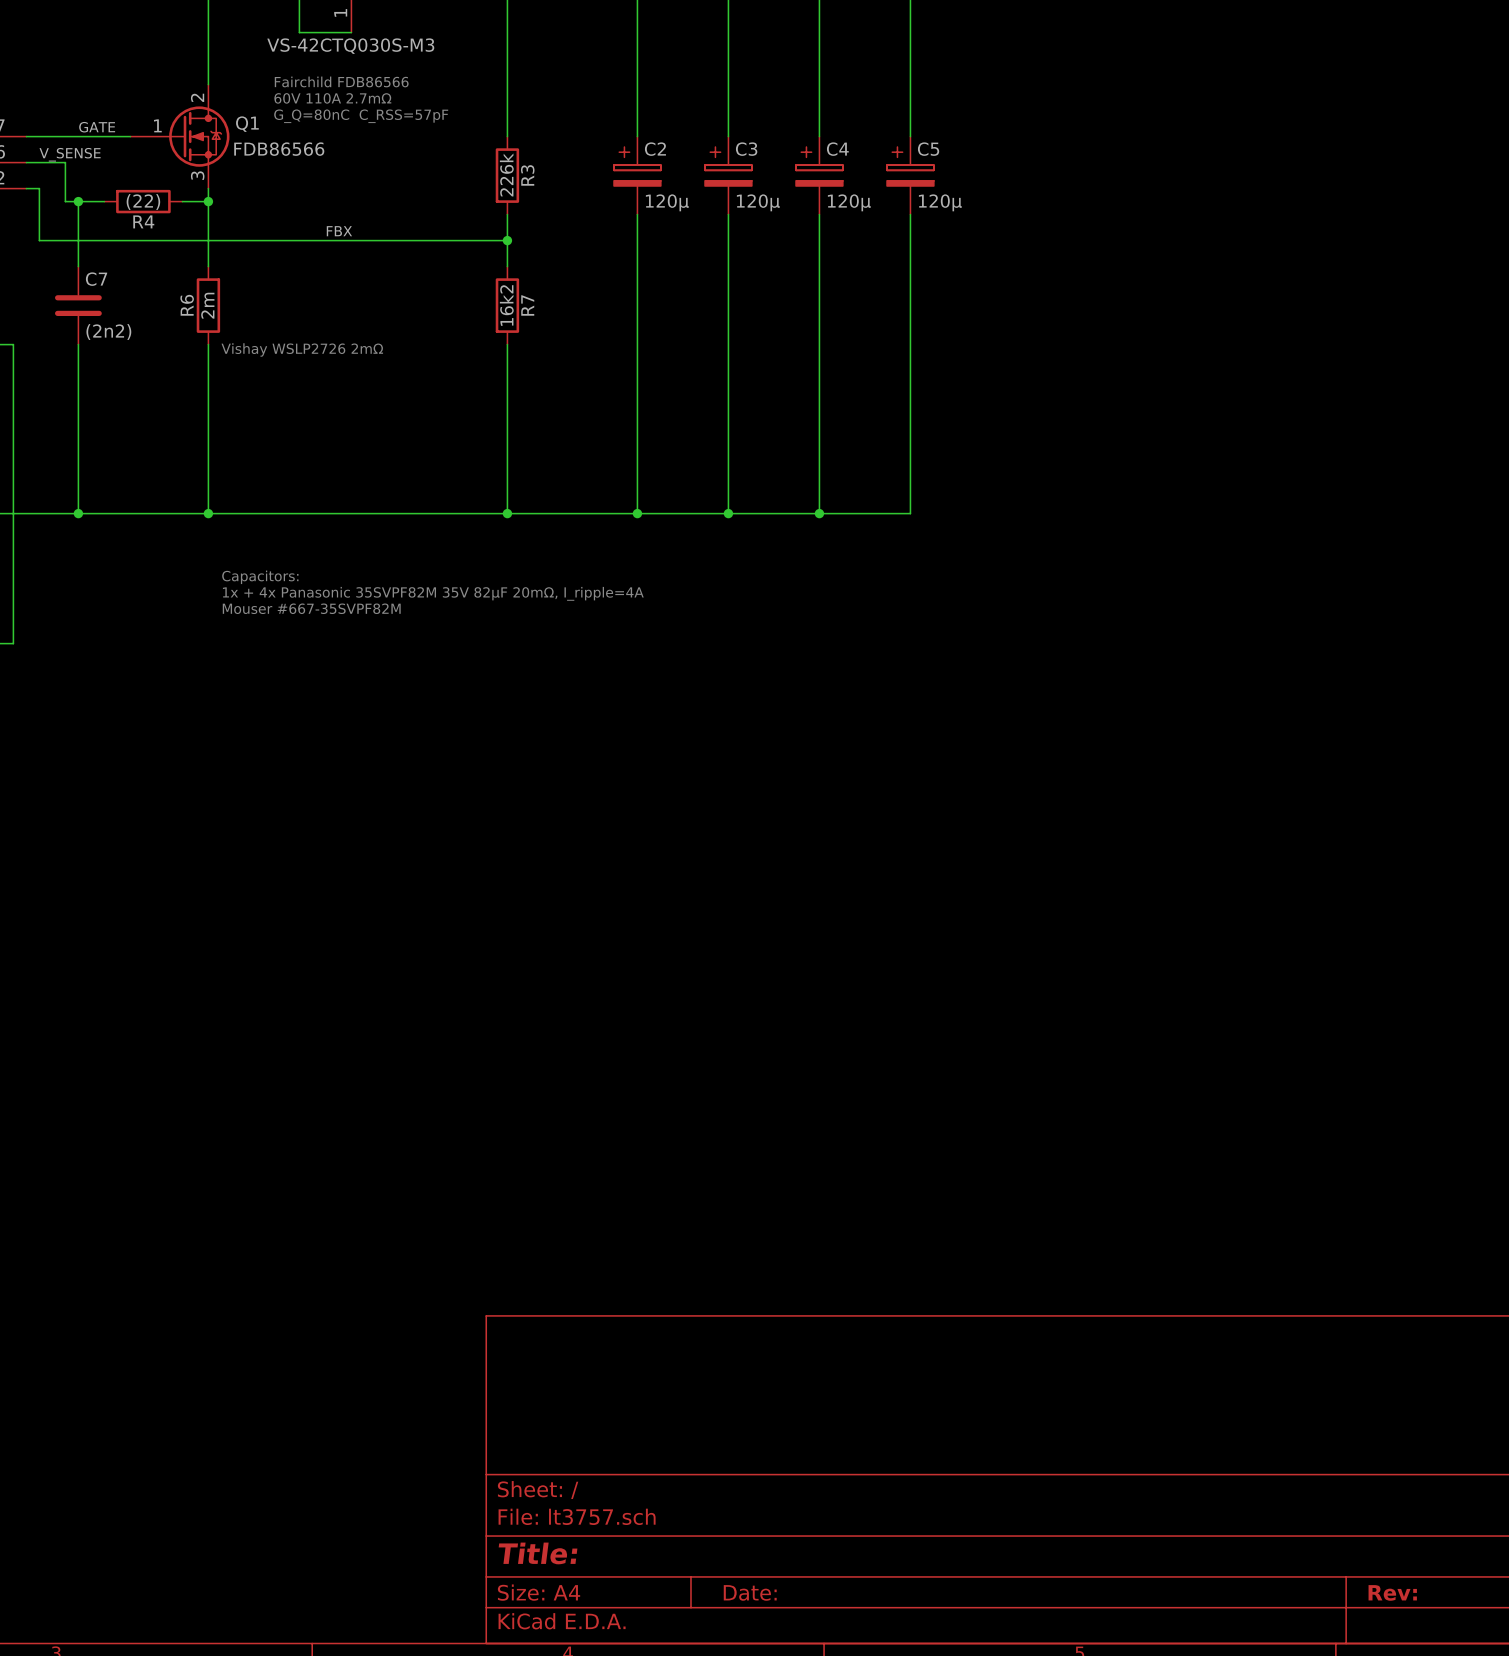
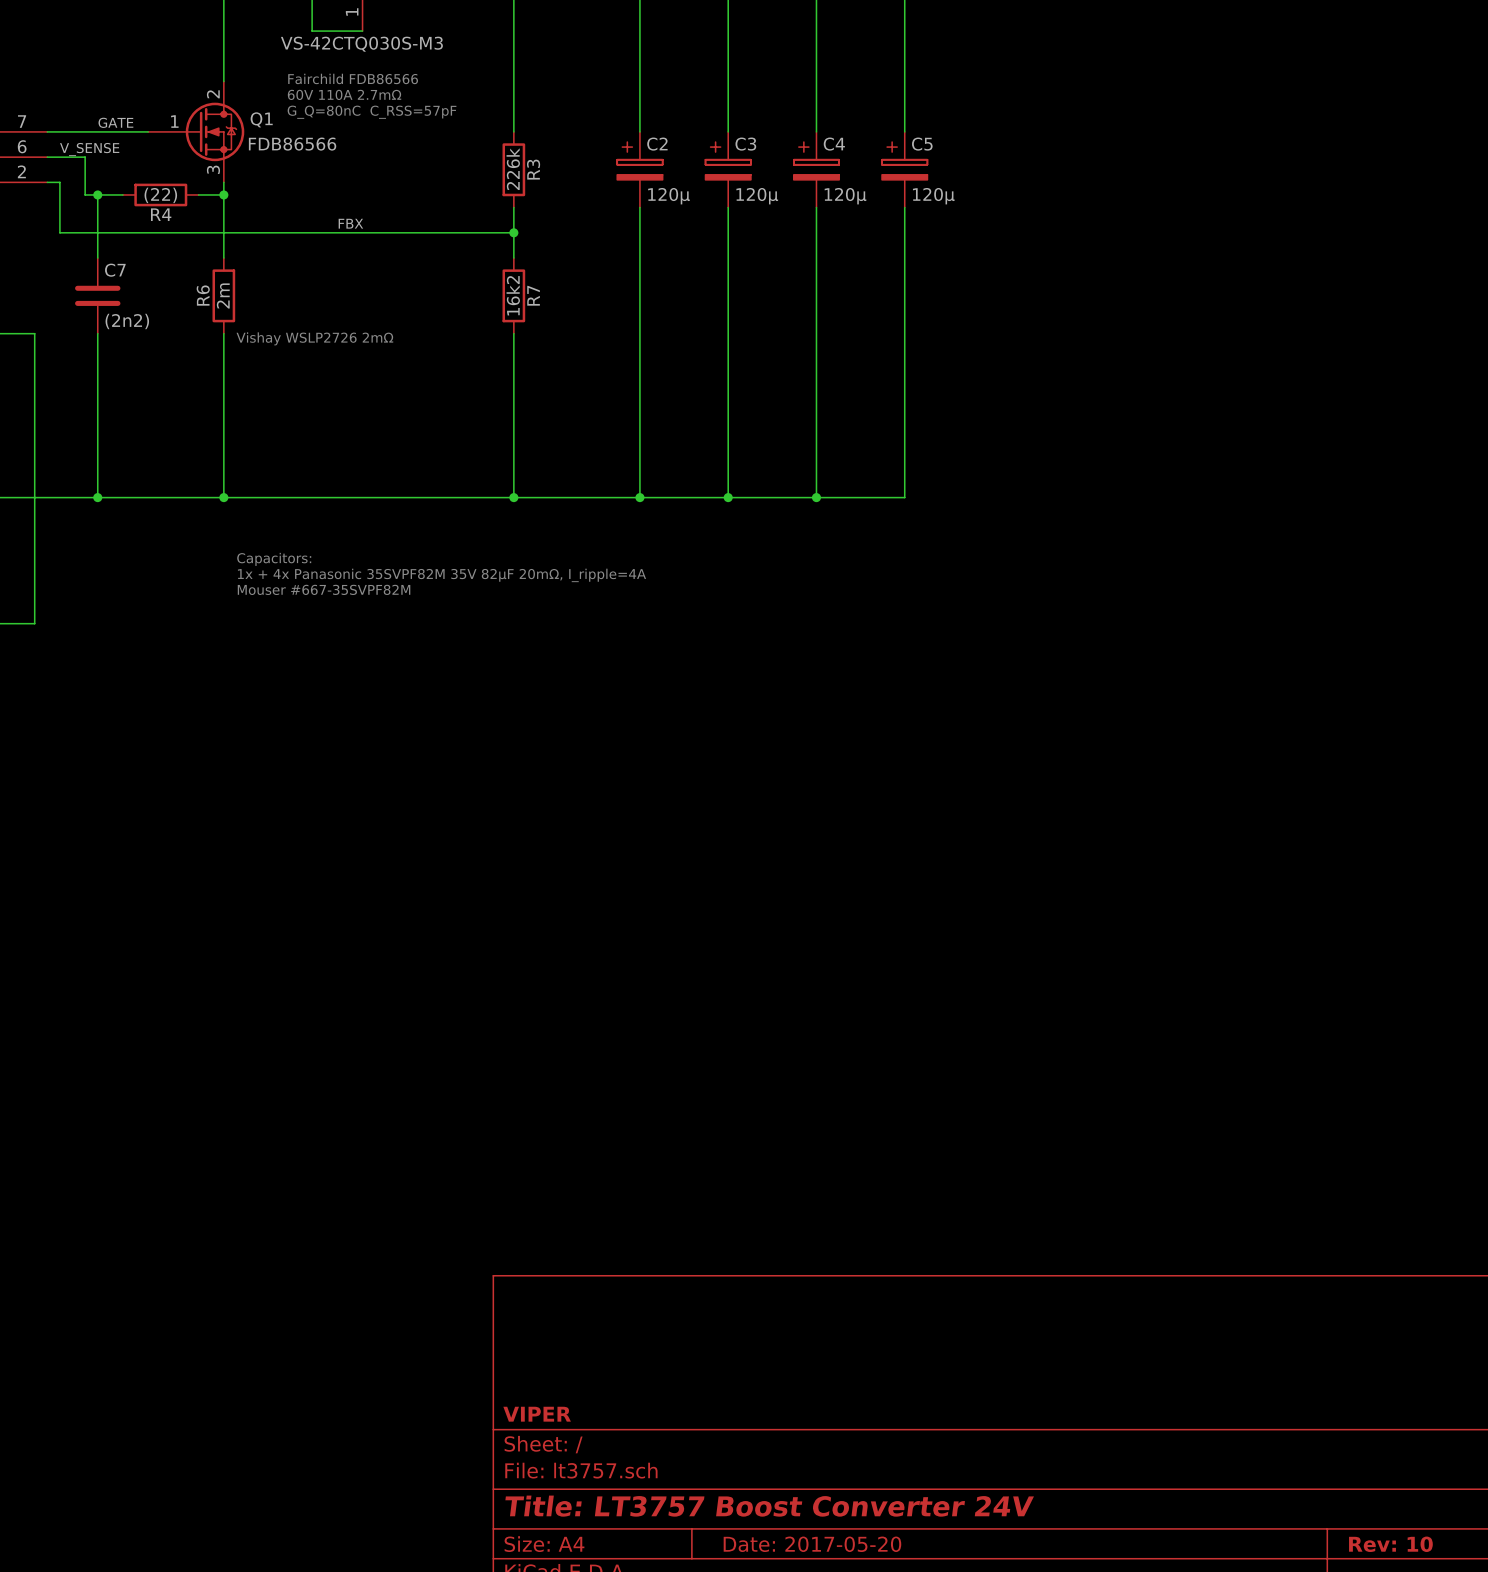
title block: none -> VIPER (537, 1414)
title block: Title: (538, 1553) -> Title: LT3757 Boost Converter 24V (769, 1506)
title block: Date: (750, 1592) -> Date: 2017-05-20 (812, 1544)
title block: Rev: (1392, 1592) -> Rev: 10 (1390, 1544)

